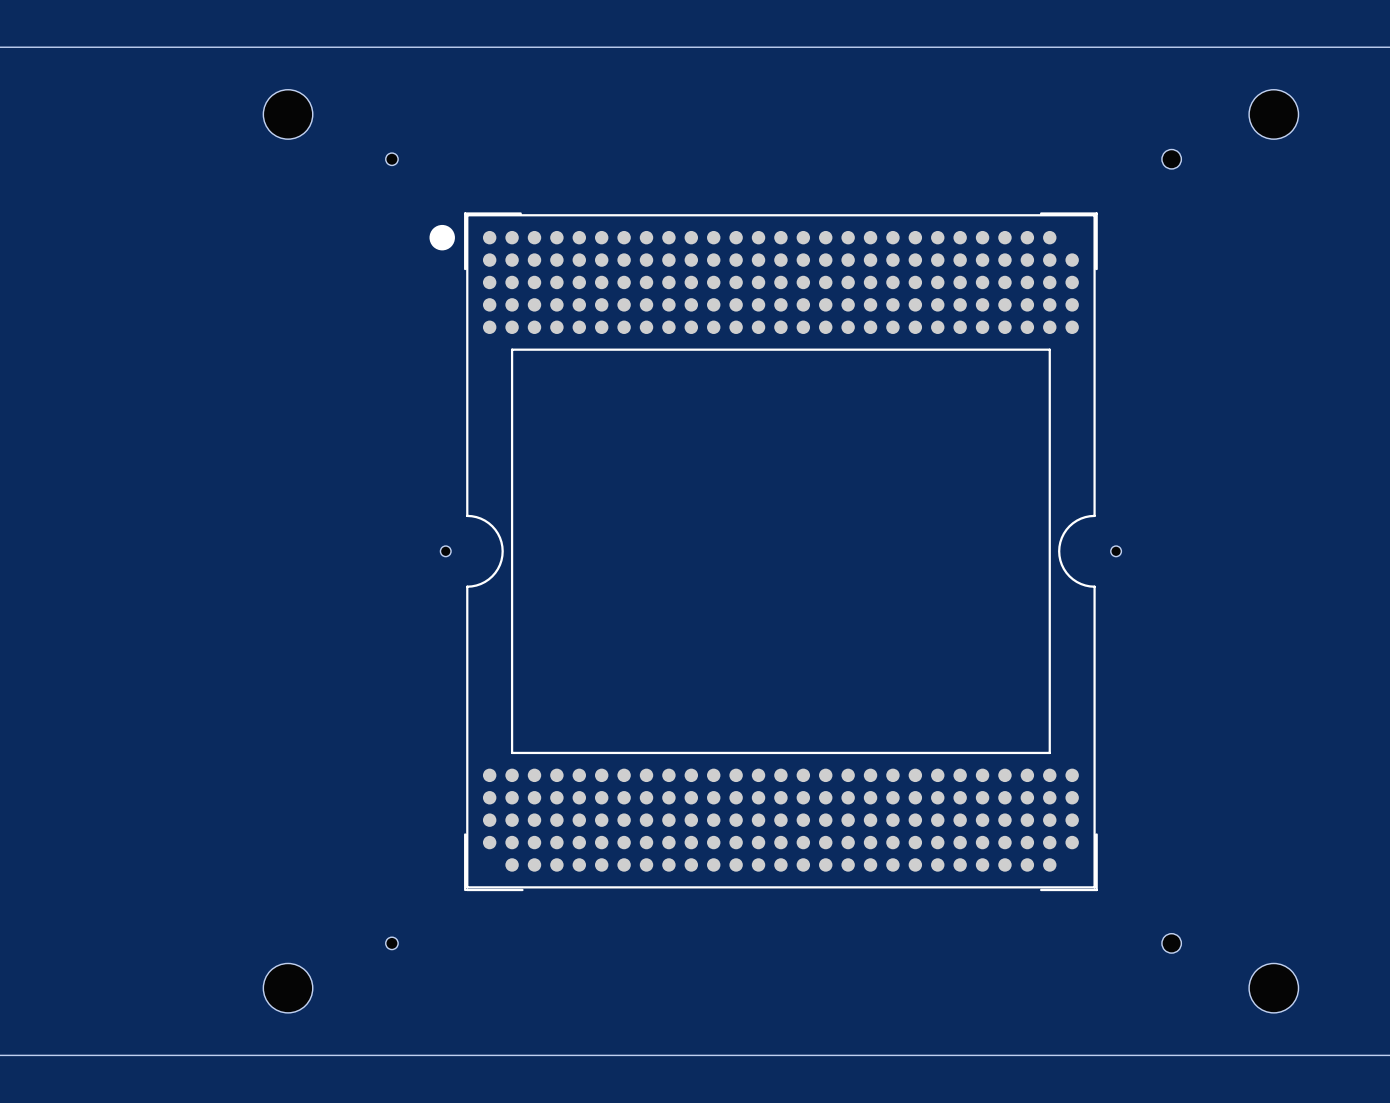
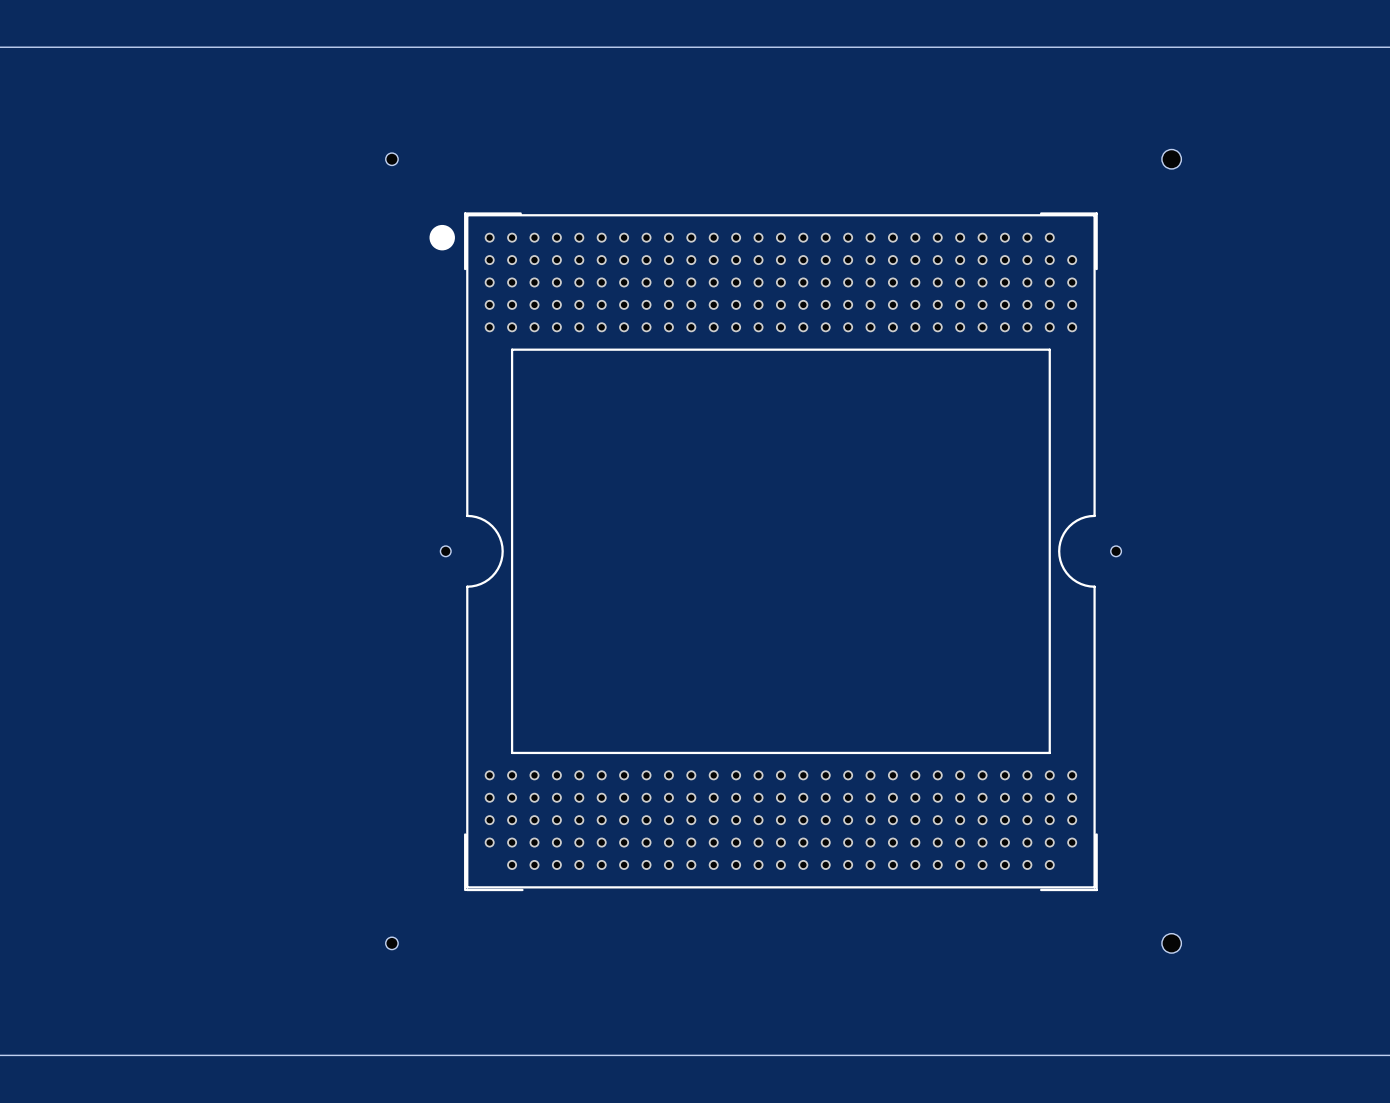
hole: (288, 114) -> none
hole: (1273, 114) -> none
part footprint: [429, 212, 1122, 892] -> [429, 212, 1122, 892]
hole: (288, 988) -> none
hole: (1273, 988) -> none

